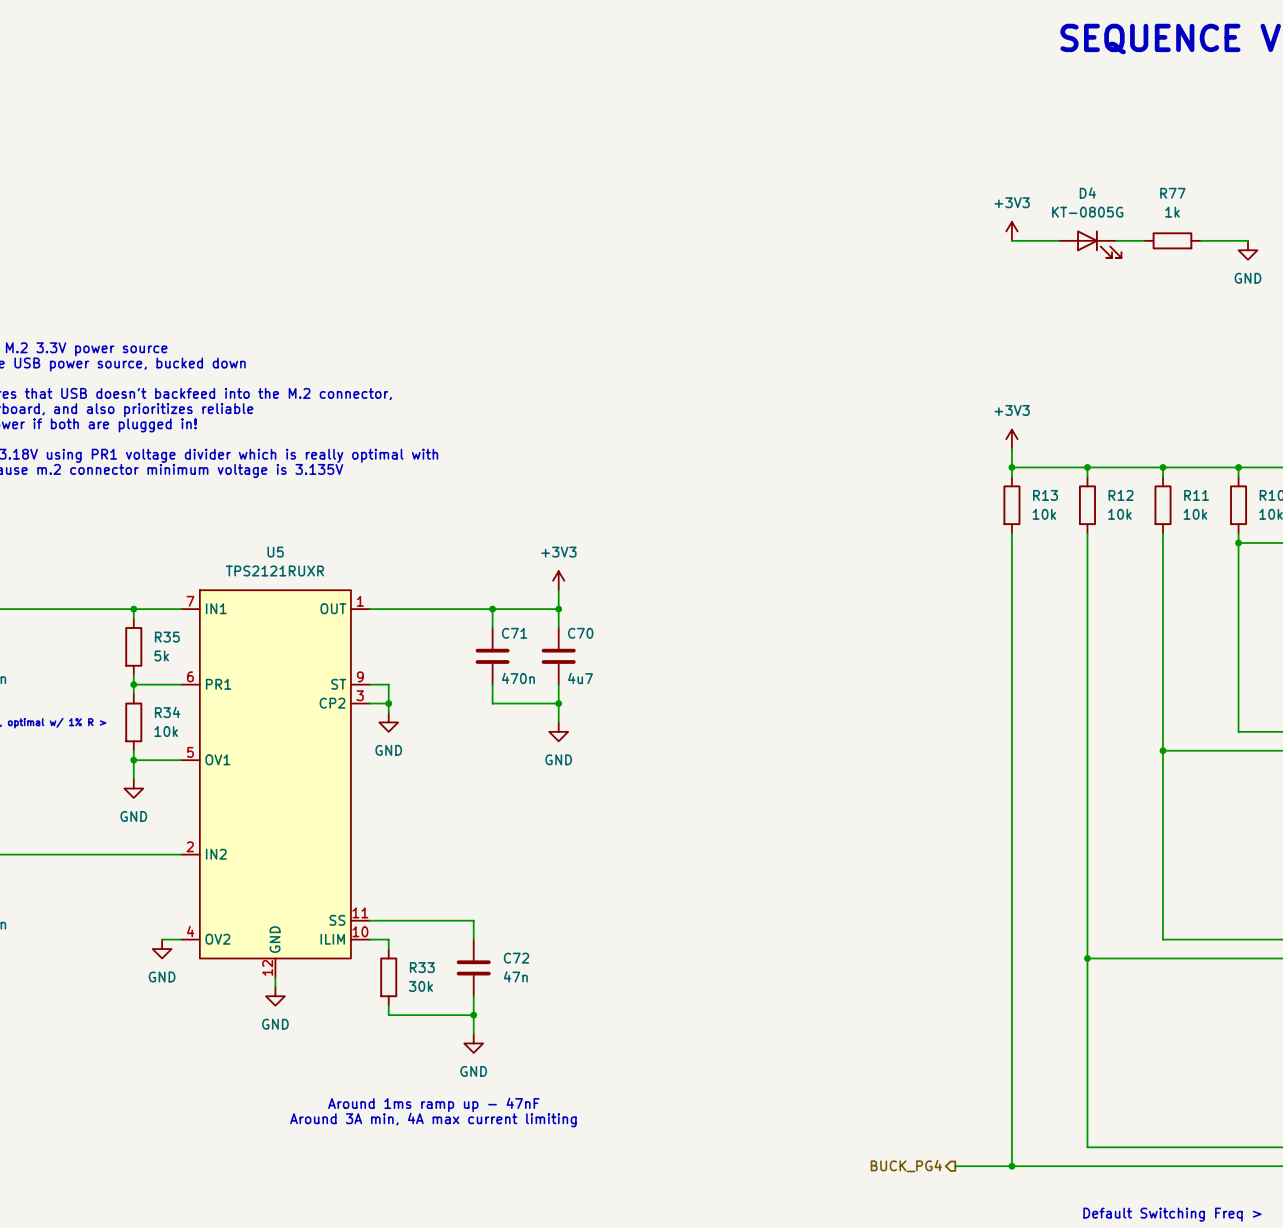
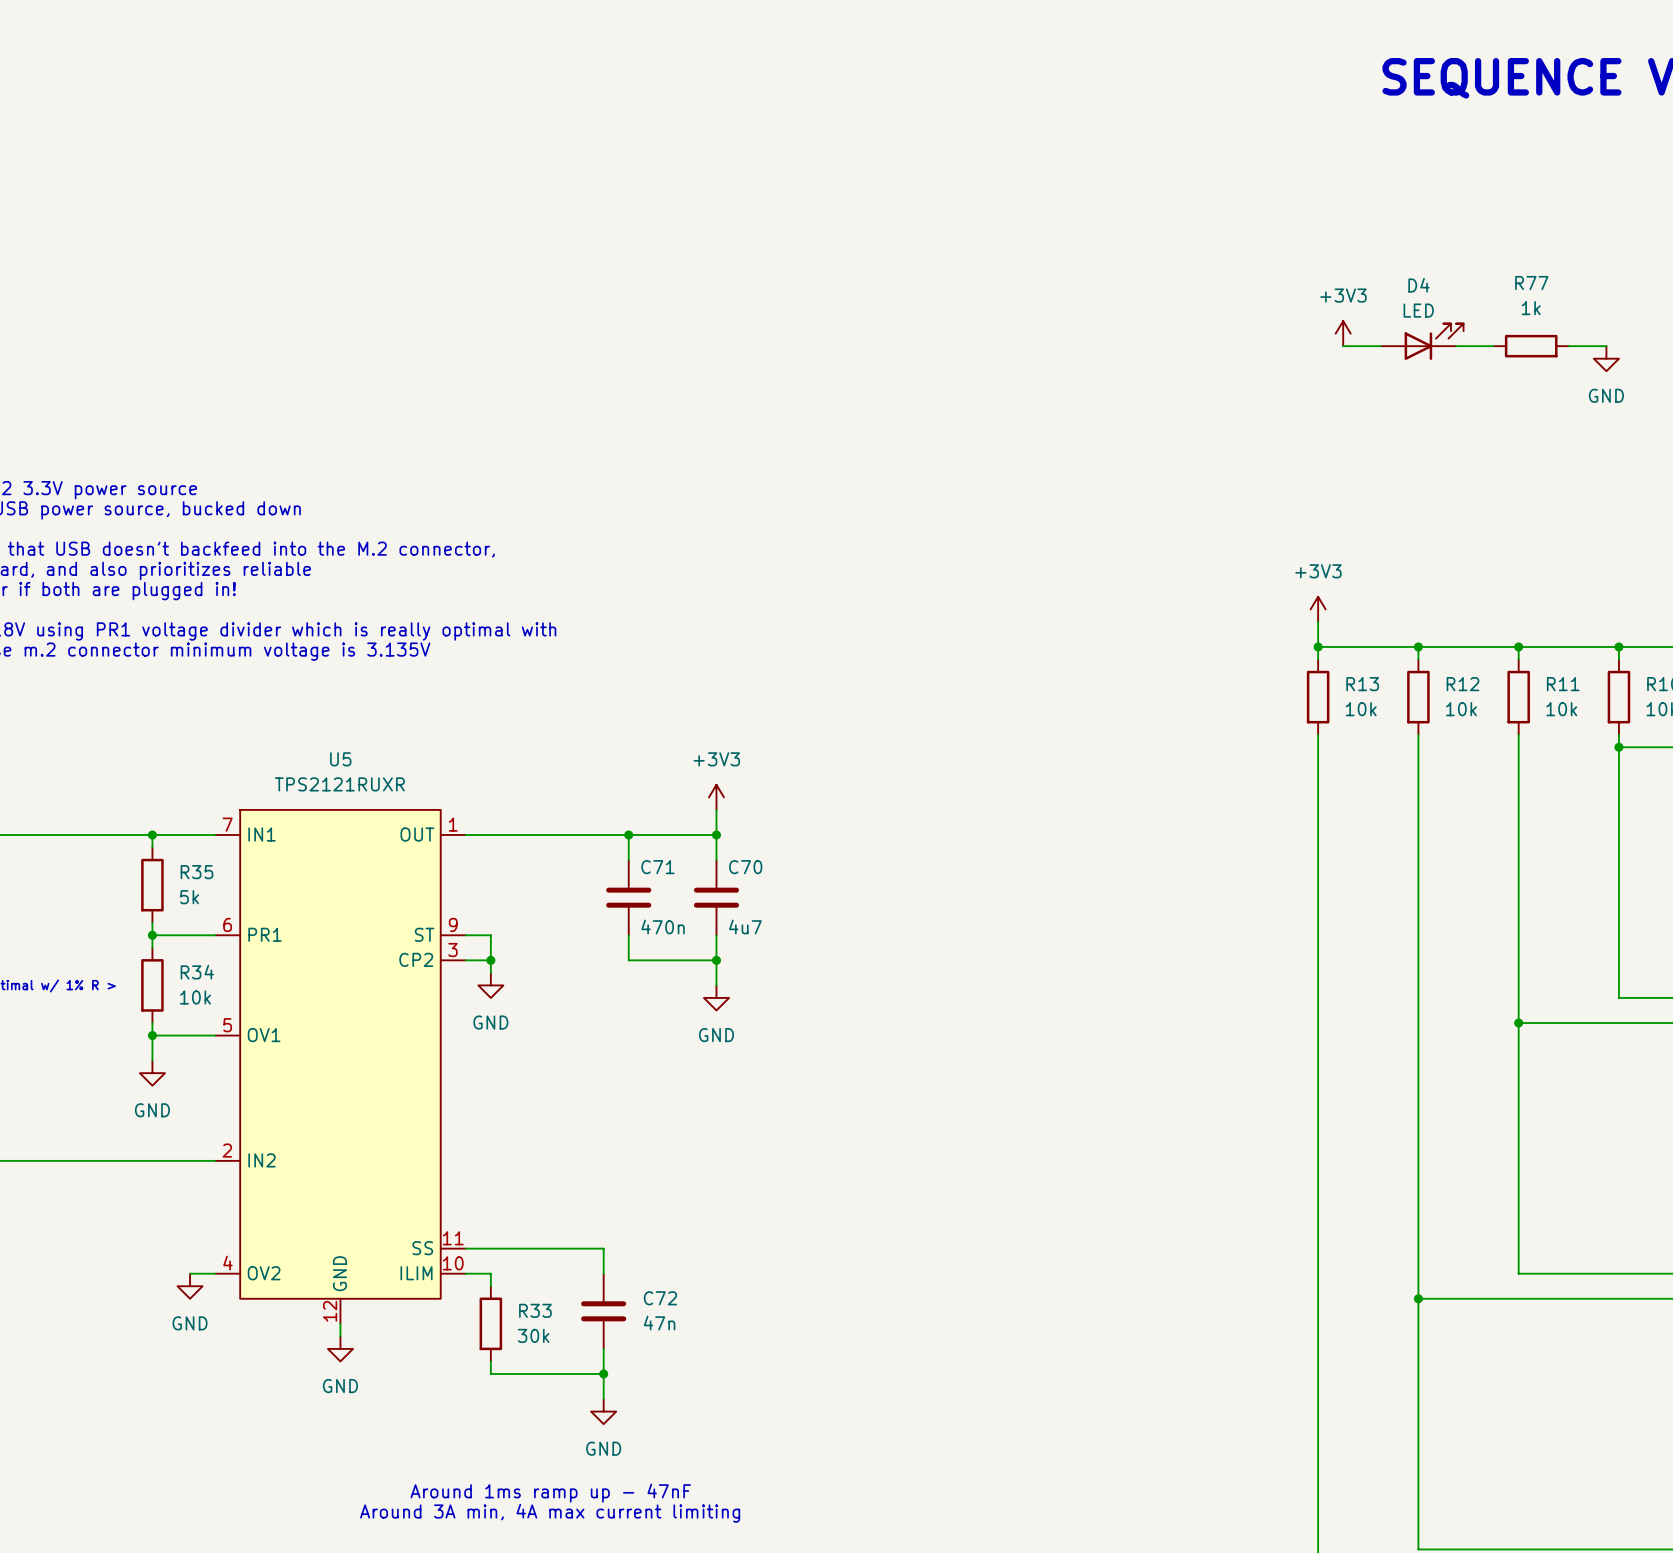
D4 value: KT-0805G (1087, 212) -> LED (1418, 310)
power symbol position: +3V3 (1011, 231) -> +3V3 (1343, 333)
wire: (1011, 240) (1030, 240) -> none
wire: (1229, 240) (1248, 240) -> none
D4 flip: as is (1099, 244) -> up-down (1434, 341)
power symbol position: GND (1248, 250) -> GND (1606, 358)

